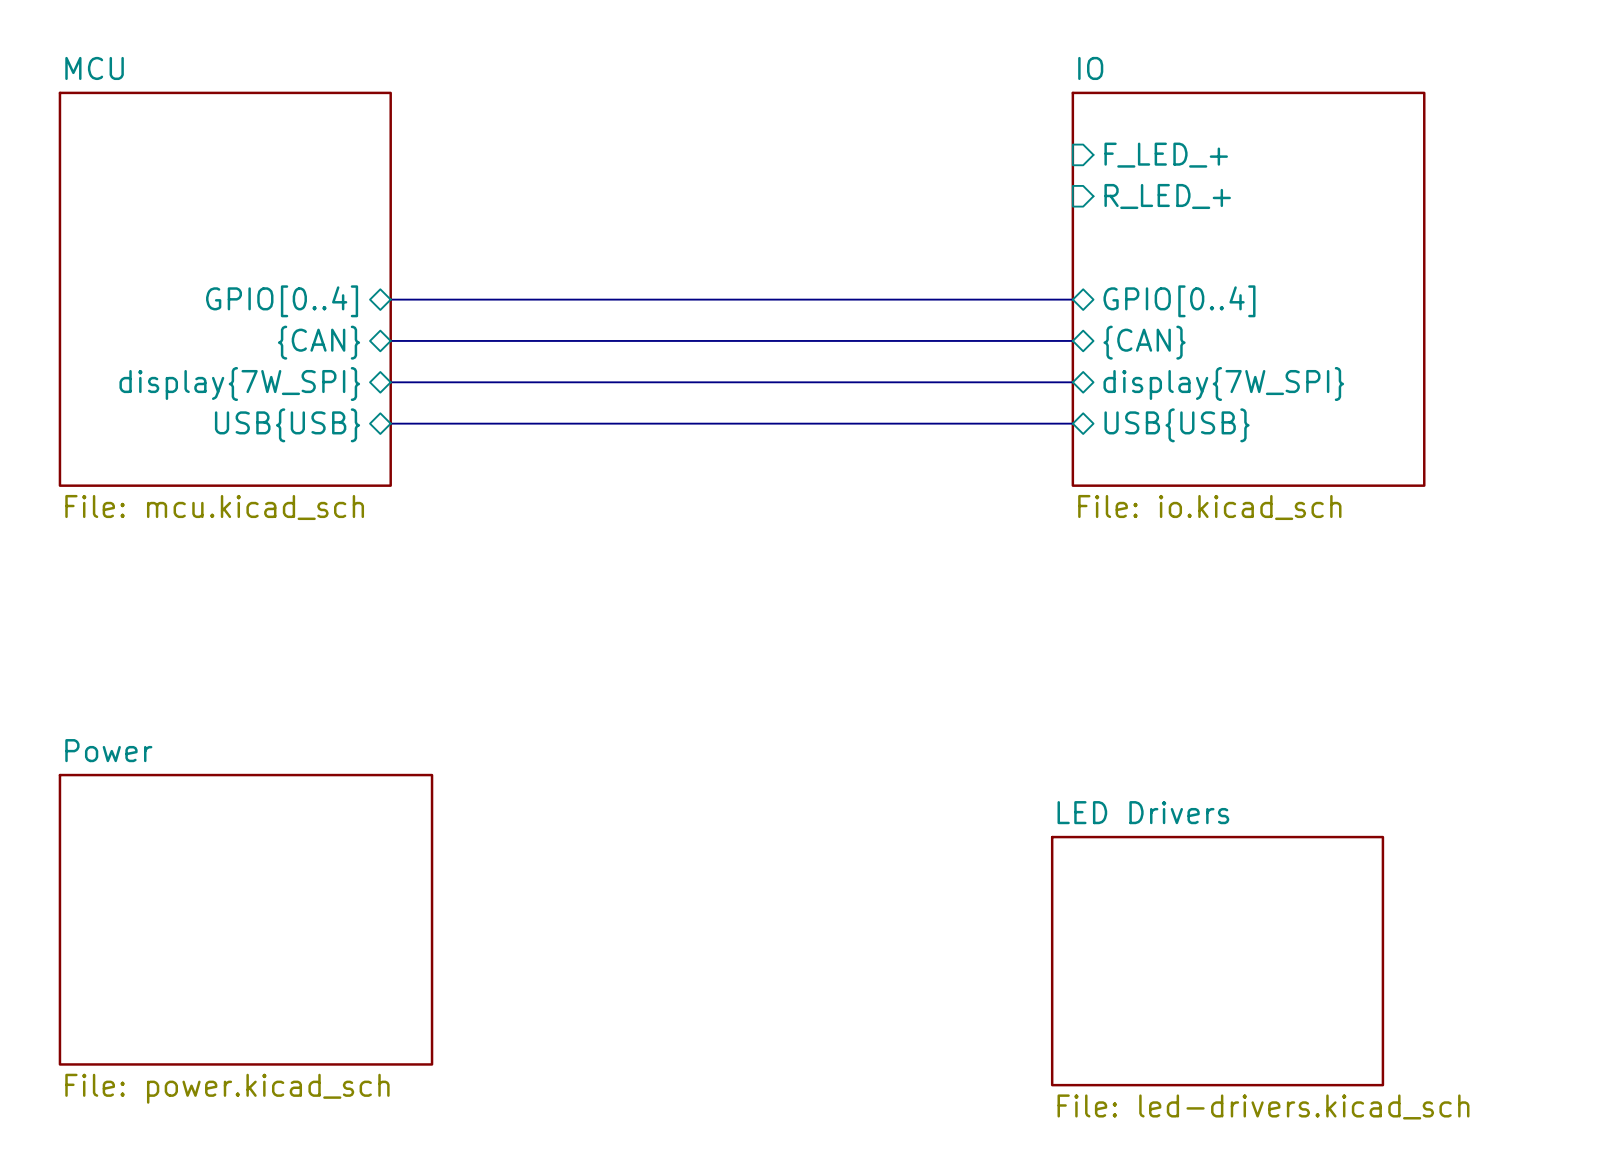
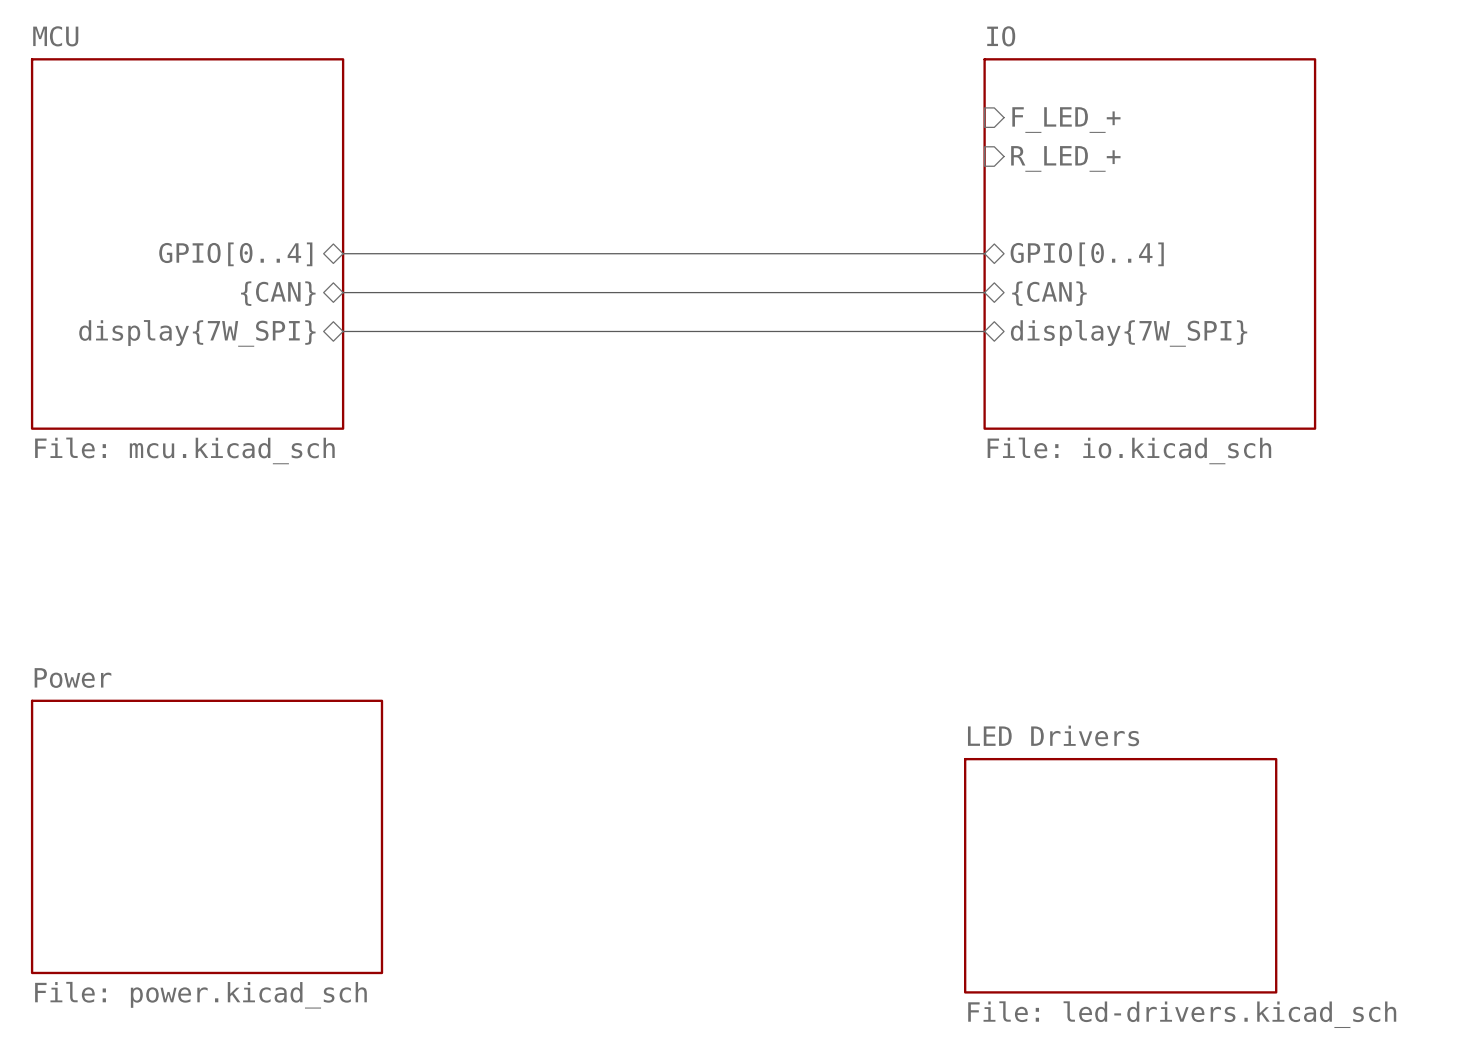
bus: (390, 423) (1072, 423) -> none
sheet pin: USB{USB} (287, 425) -> none
sheet pin: USB{USB} (1177, 425) -> none

